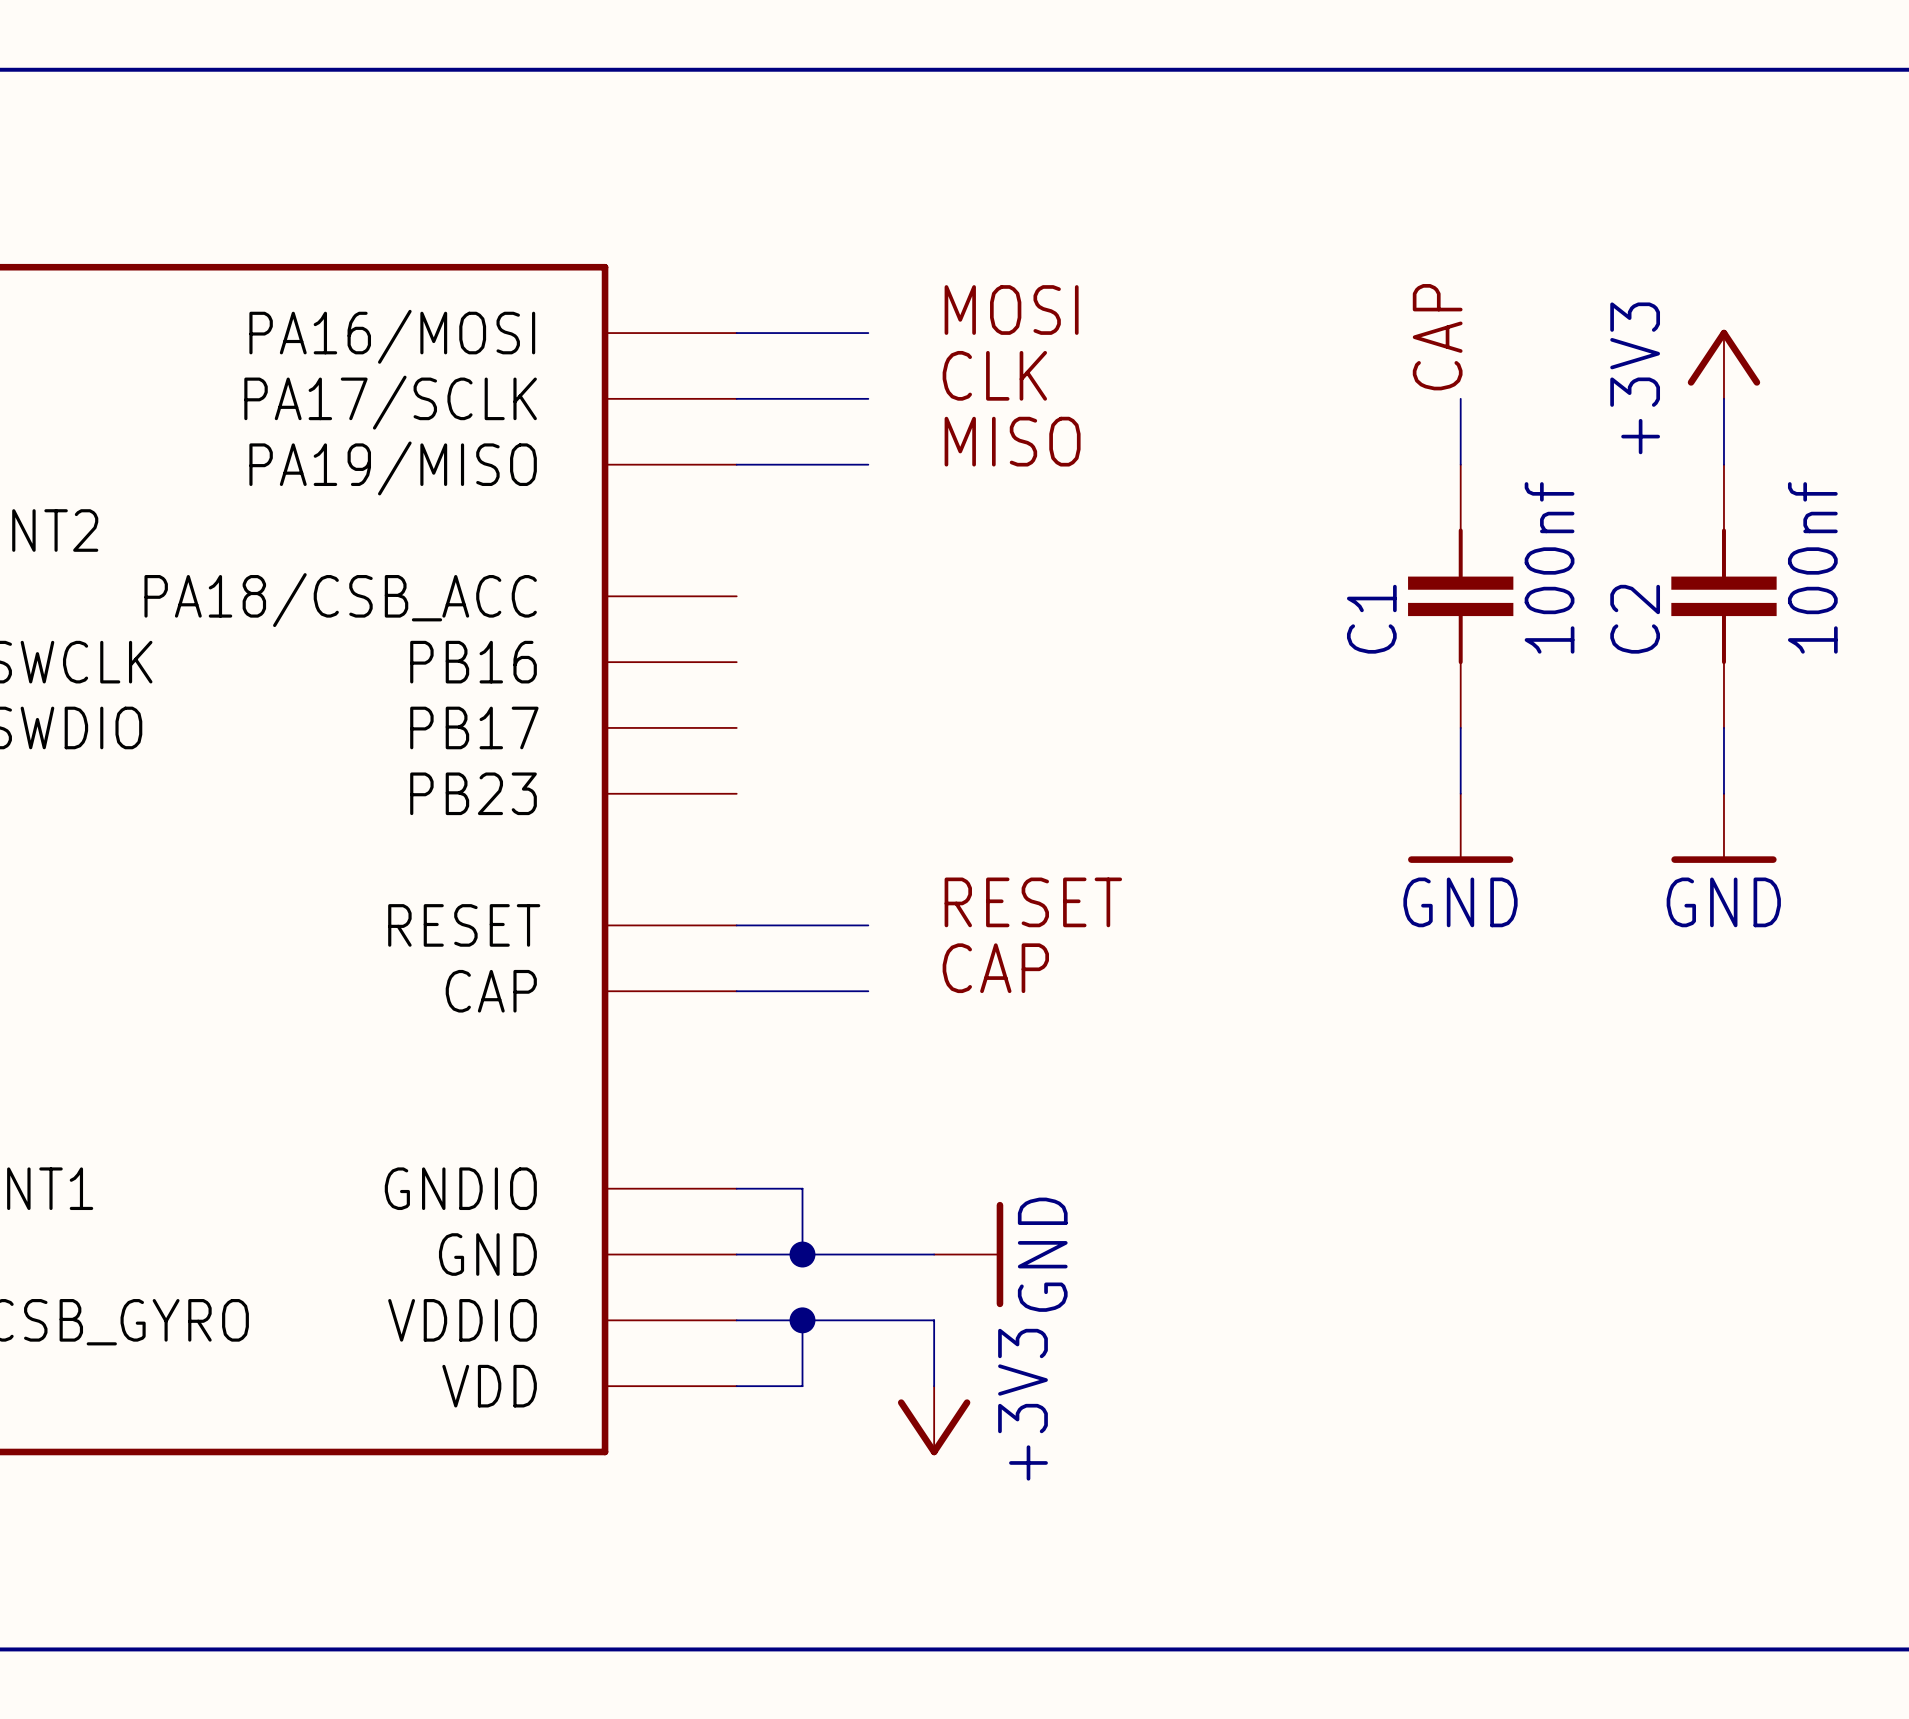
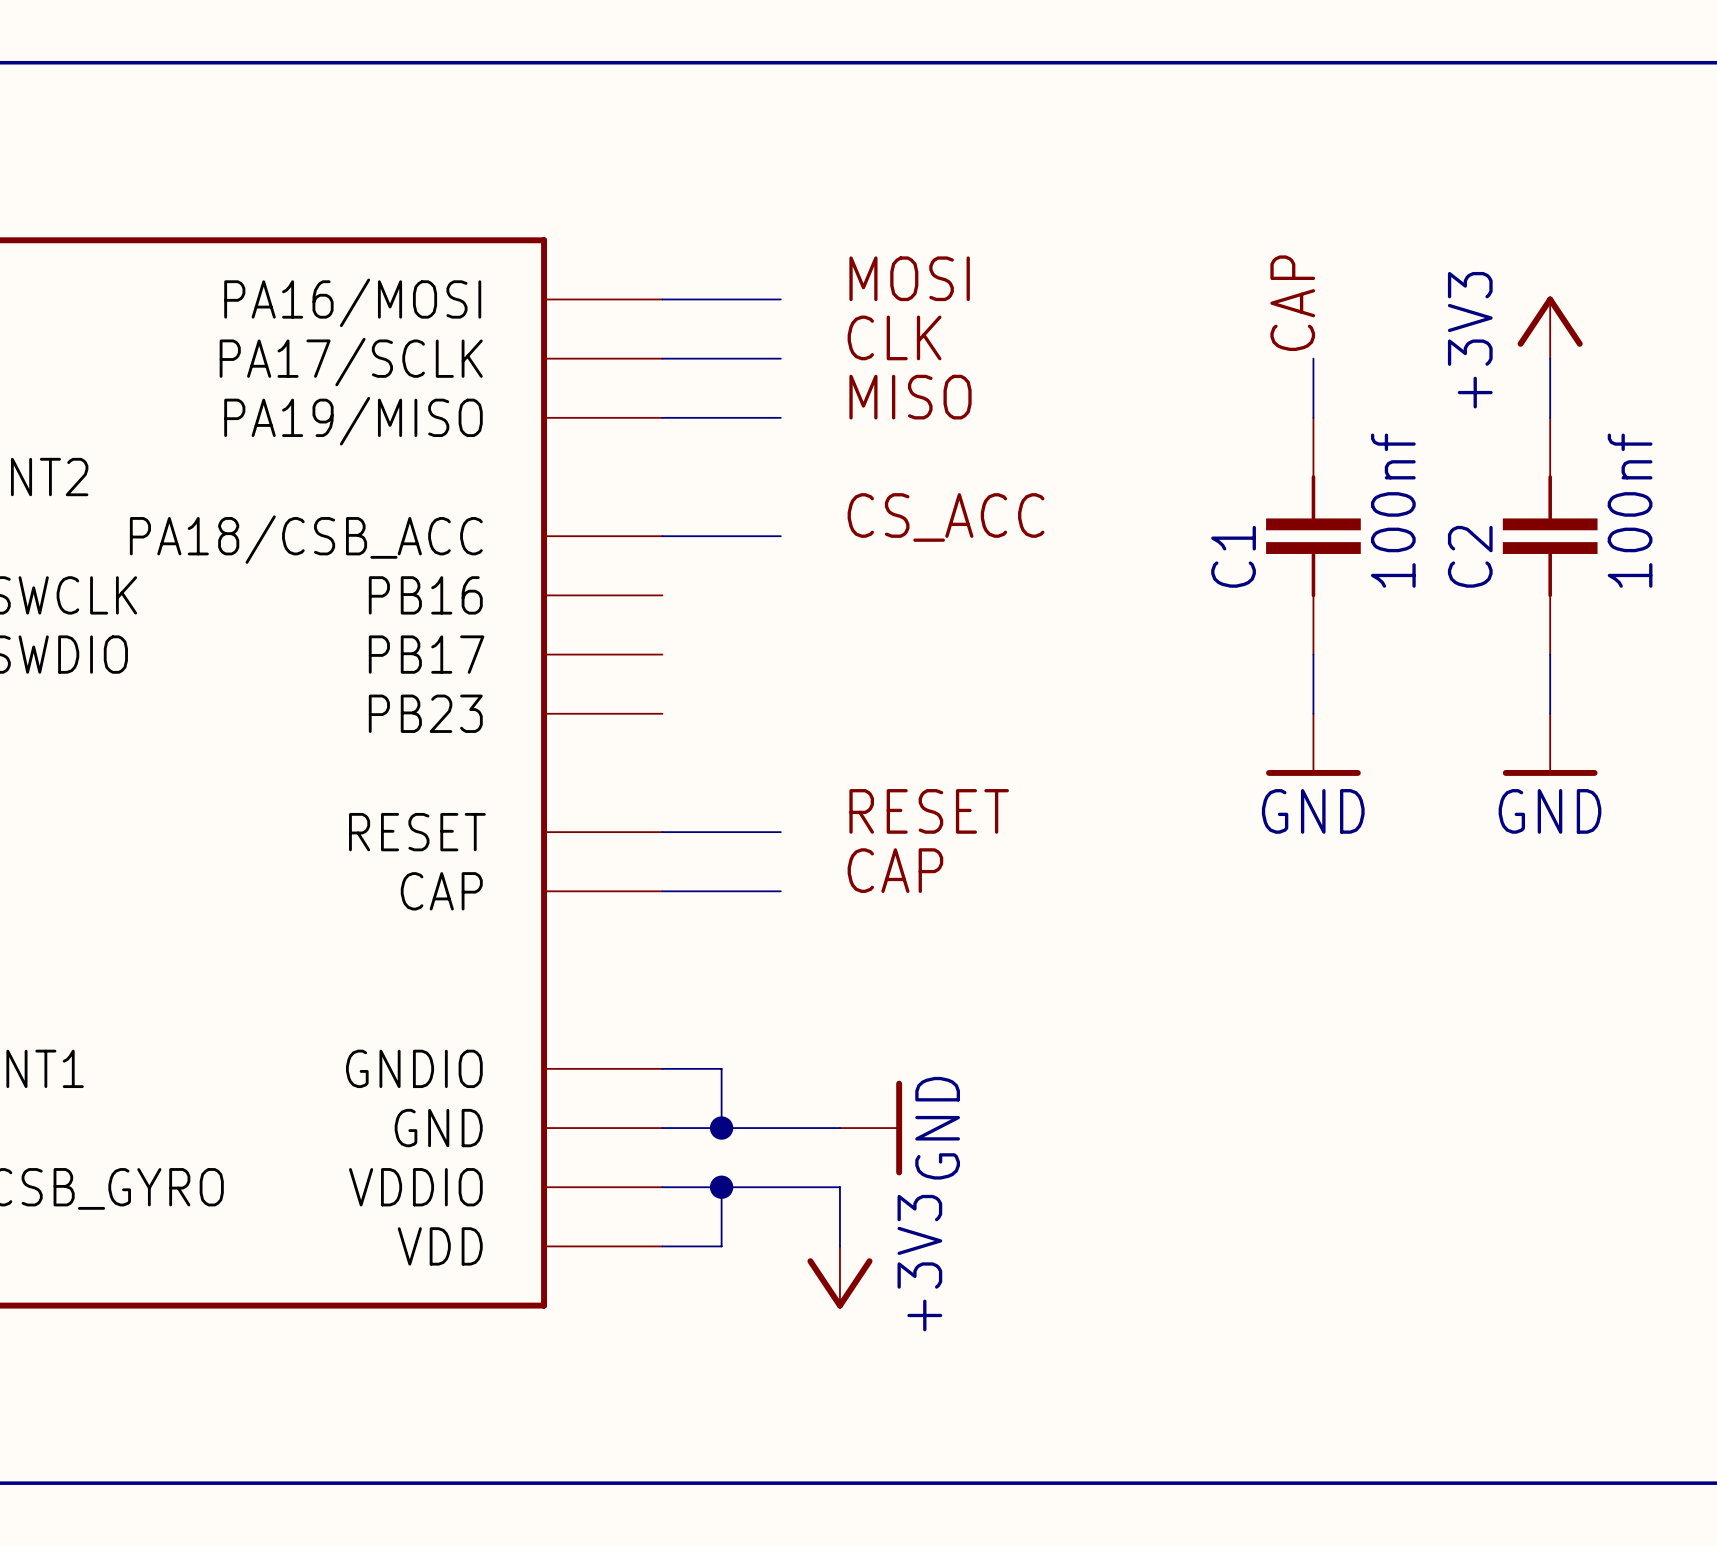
label: none -> CS_ACC (946, 517)
wire: none -> (662, 536) (780, 536)

